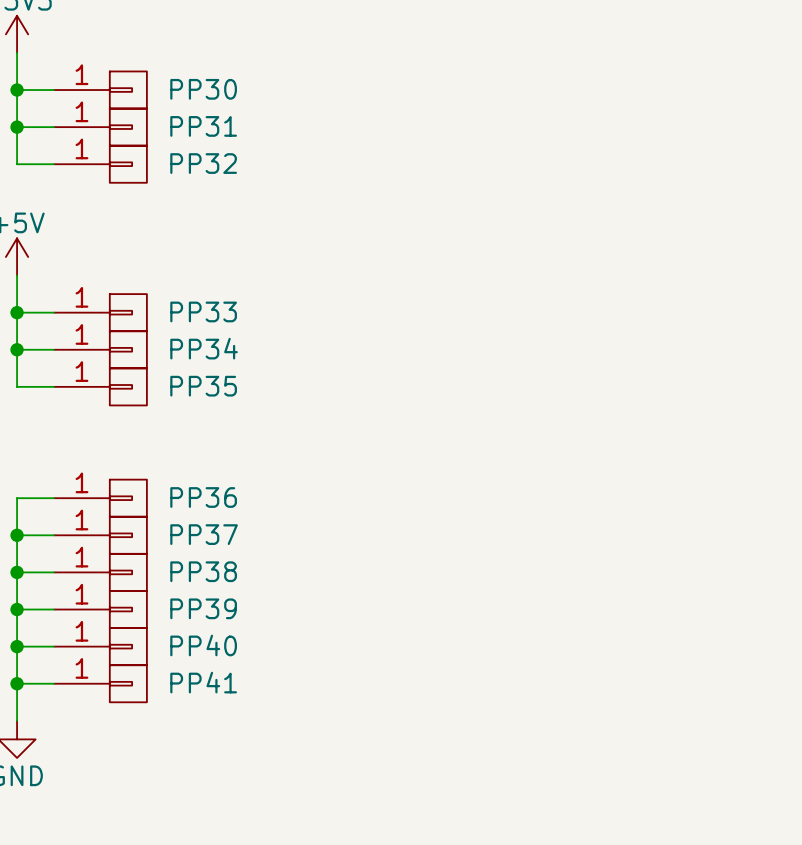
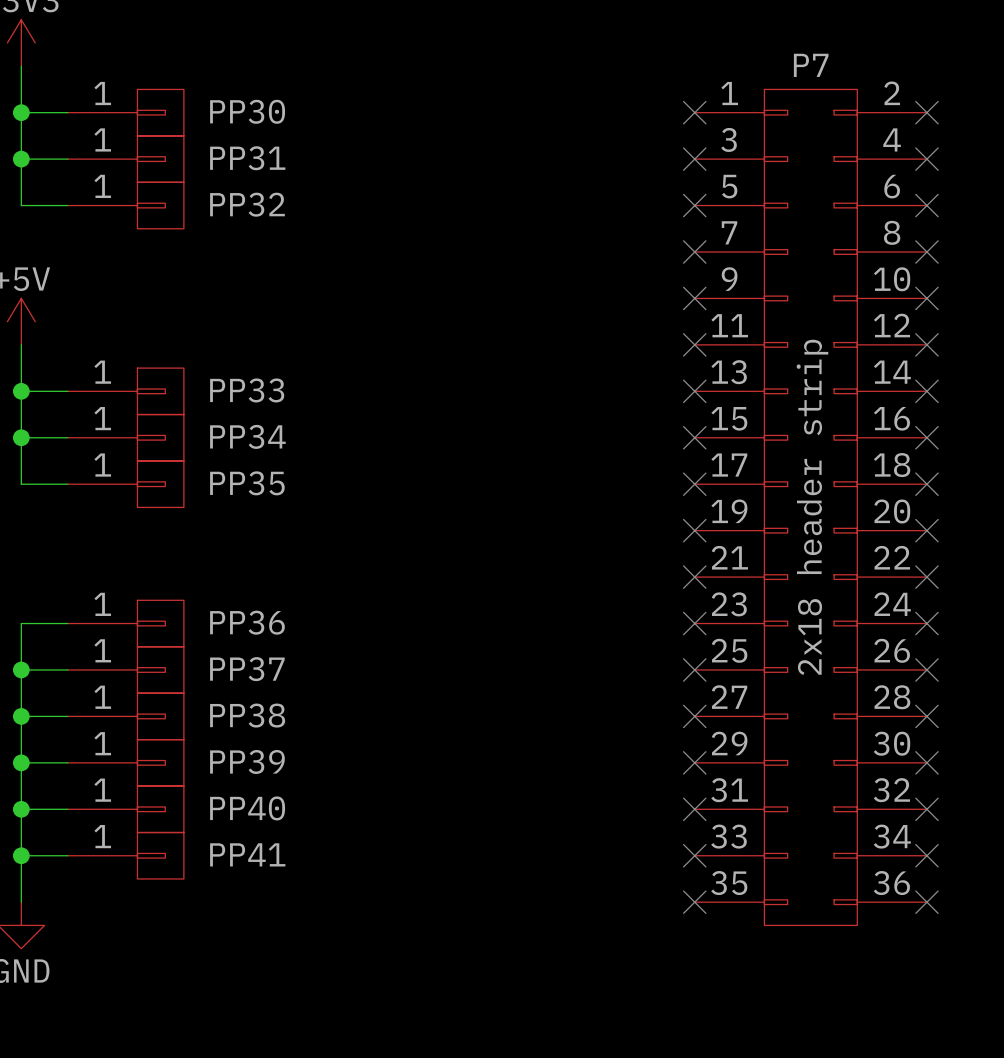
no-connect mark: none -> (694, 112)
no-connect mark: none -> (926, 112)
no-connect mark: none -> (694, 159)
no-connect mark: none -> (926, 159)
no-connect mark: none -> (694, 205)
no-connect mark: none -> (926, 205)
no-connect mark: none -> (694, 251)
no-connect mark: none -> (926, 251)
no-connect mark: none -> (694, 298)
no-connect mark: none -> (926, 298)
no-connect mark: none -> (694, 344)
no-connect mark: none -> (926, 344)
no-connect mark: none -> (694, 391)
no-connect mark: none -> (926, 391)
no-connect mark: none -> (694, 437)
no-connect mark: none -> (926, 437)
no-connect mark: none -> (694, 484)
no-connect mark: none -> (926, 484)
P7: none -> 2x18 header strip (810, 507)
no-connect mark: none -> (694, 530)
no-connect mark: none -> (926, 530)
no-connect mark: none -> (694, 577)
no-connect mark: none -> (926, 577)
no-connect mark: none -> (694, 623)
no-connect mark: none -> (926, 623)
no-connect mark: none -> (694, 669)
no-connect mark: none -> (926, 669)
no-connect mark: none -> (694, 716)
no-connect mark: none -> (926, 716)
no-connect mark: none -> (694, 762)
no-connect mark: none -> (926, 762)
no-connect mark: none -> (694, 809)
no-connect mark: none -> (926, 809)
no-connect mark: none -> (694, 855)
no-connect mark: none -> (926, 855)
no-connect mark: none -> (694, 902)
no-connect mark: none -> (926, 902)

